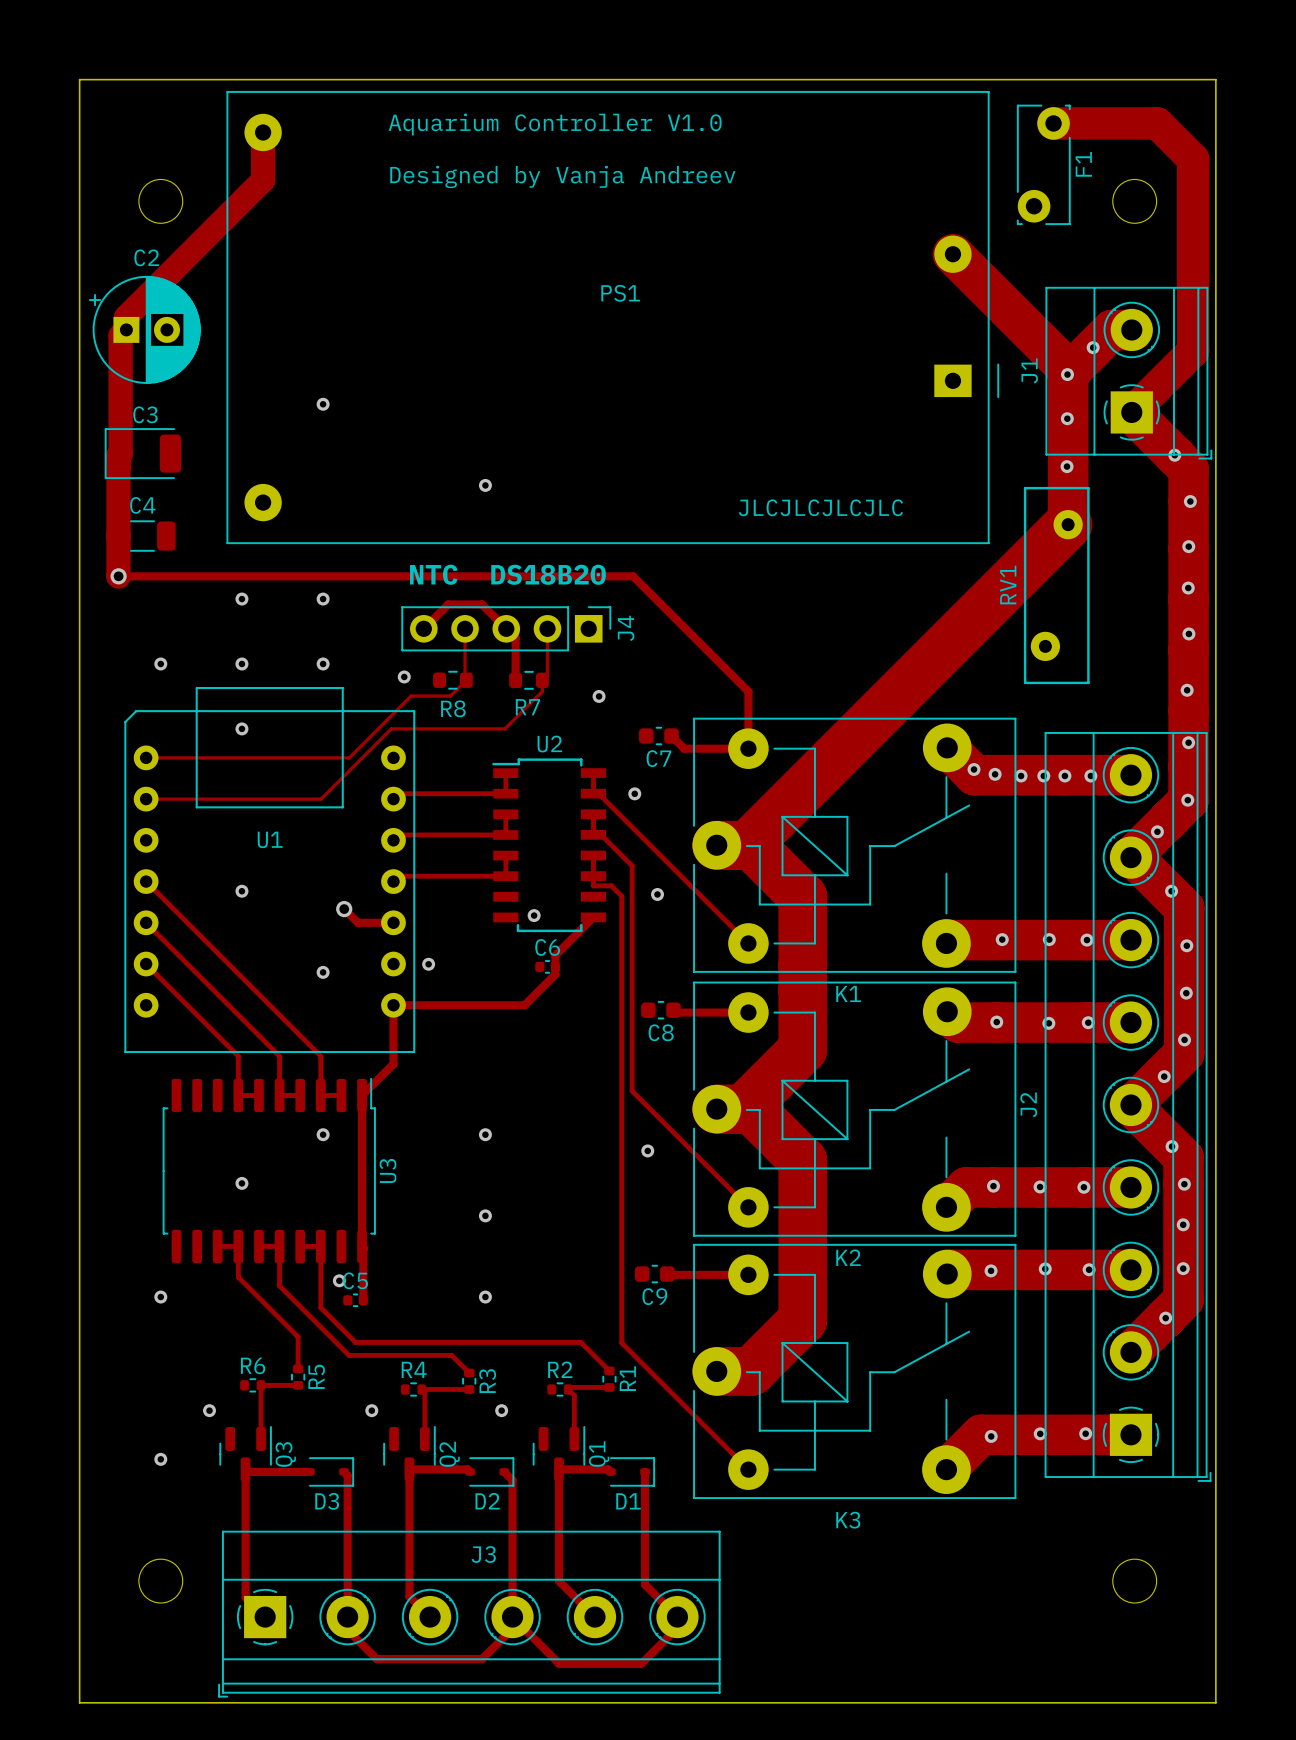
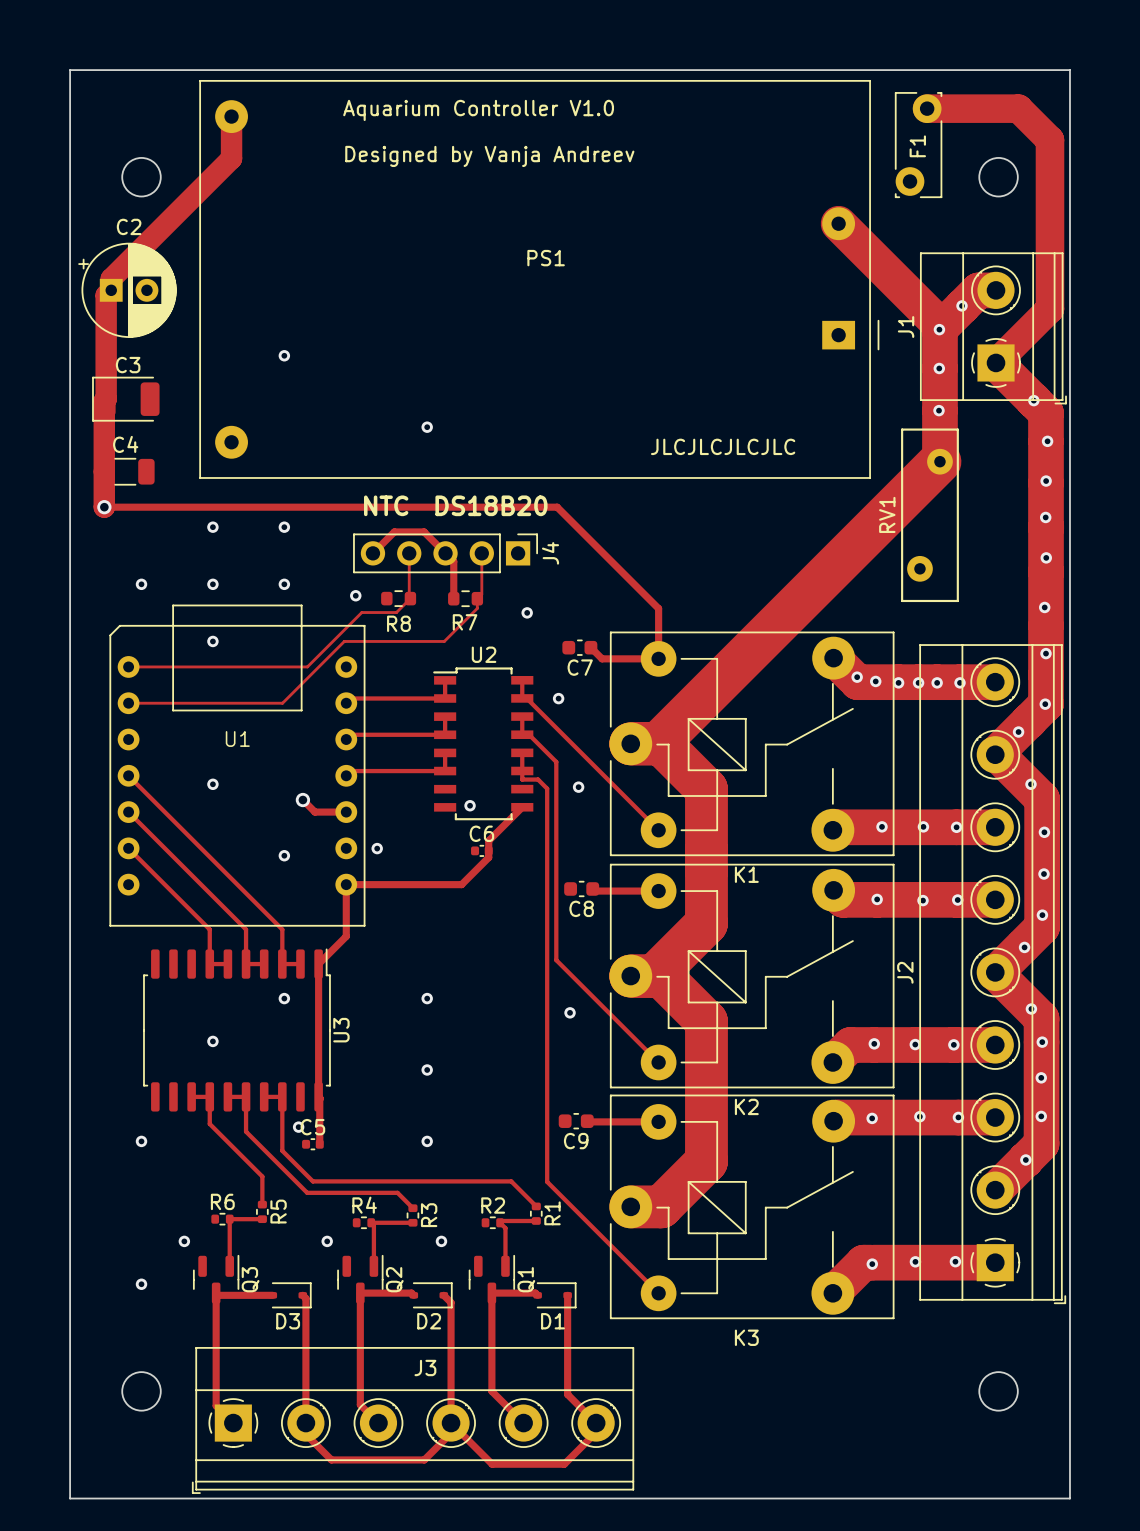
F1 name position: F1 (1083, 164) -> F1 (917, 146)

